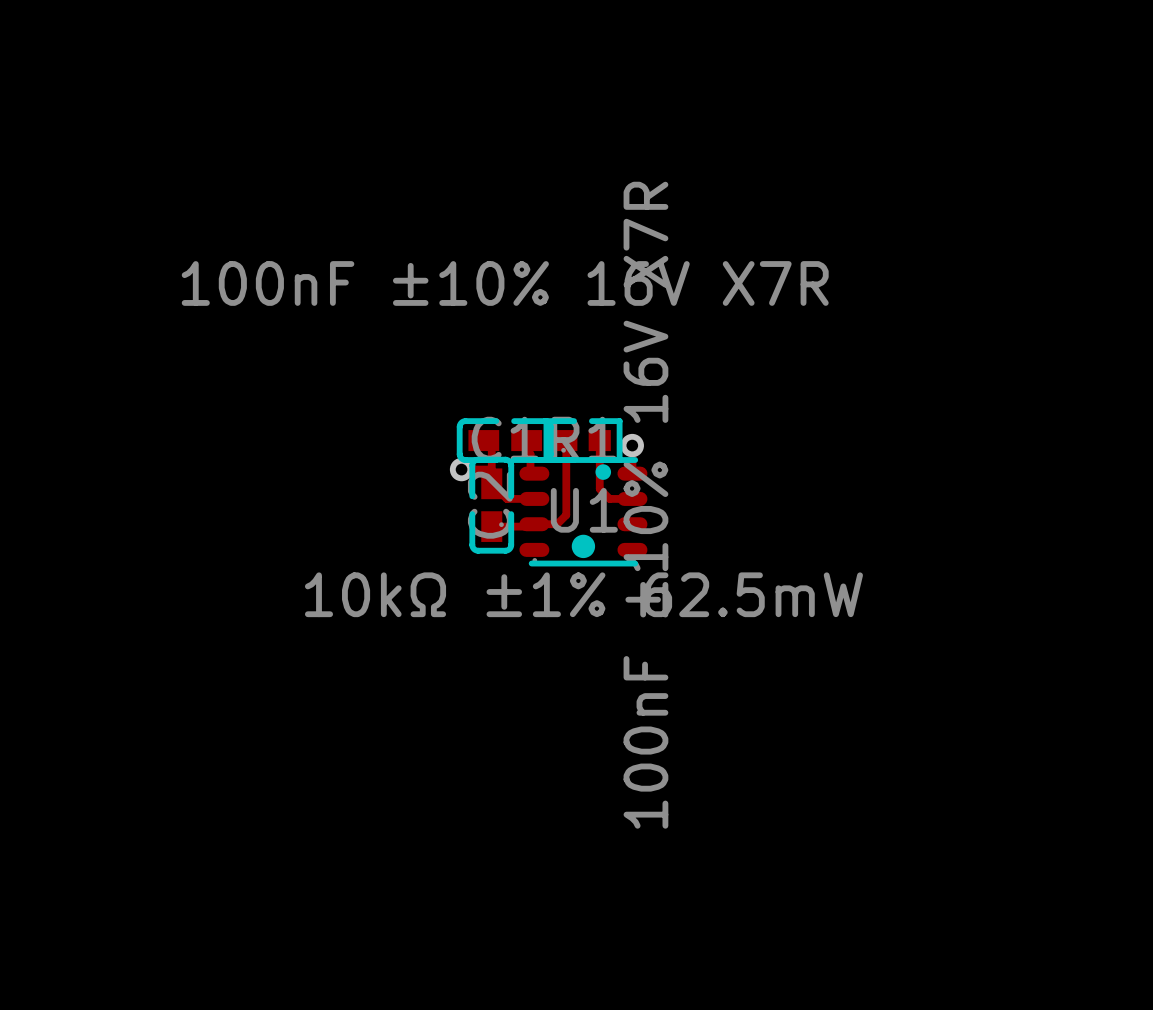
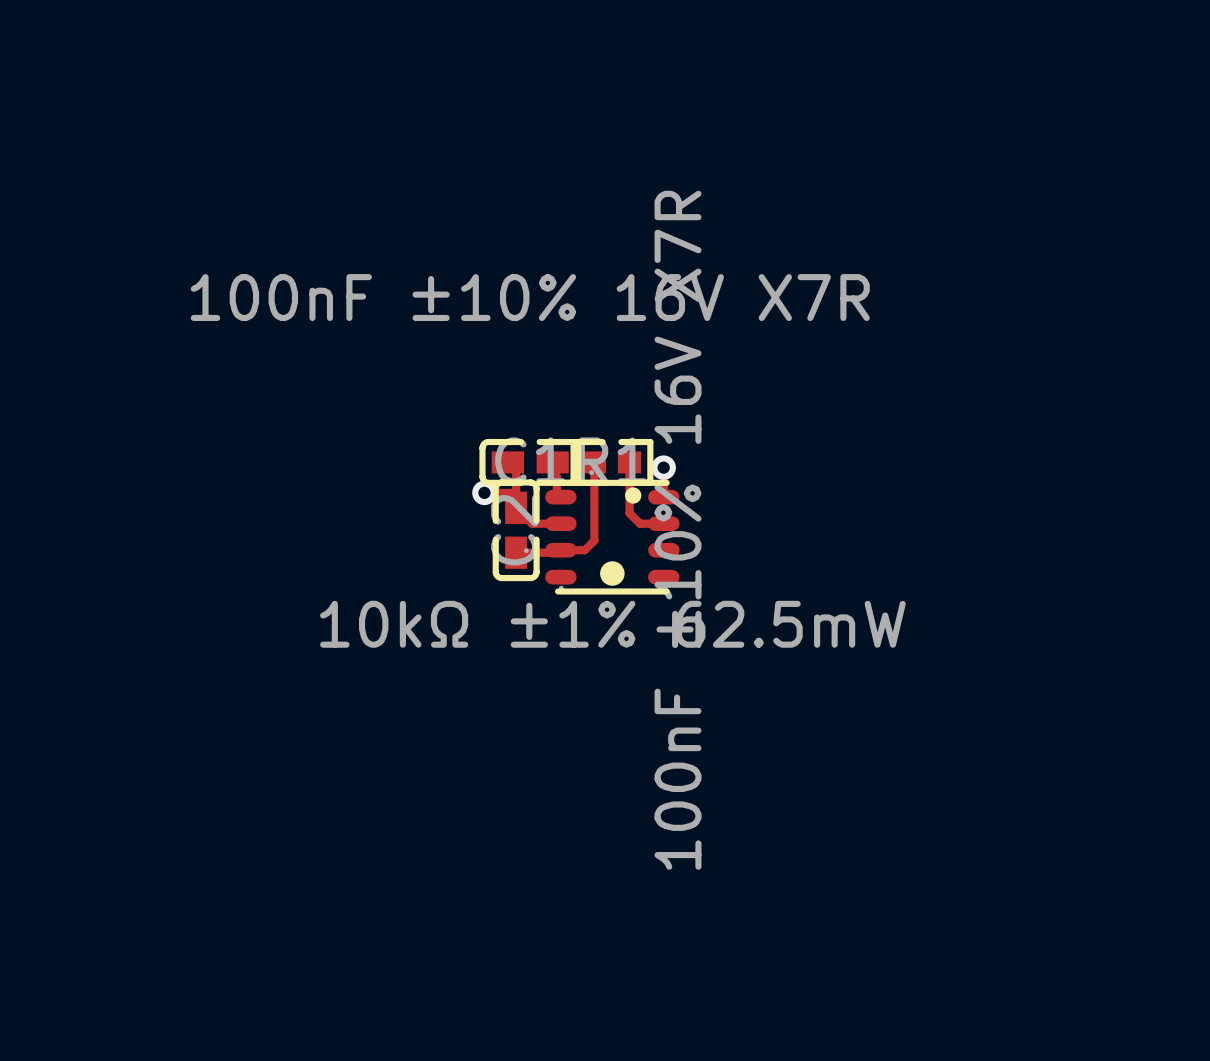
U1 name: U1 (584, 510) -> none

